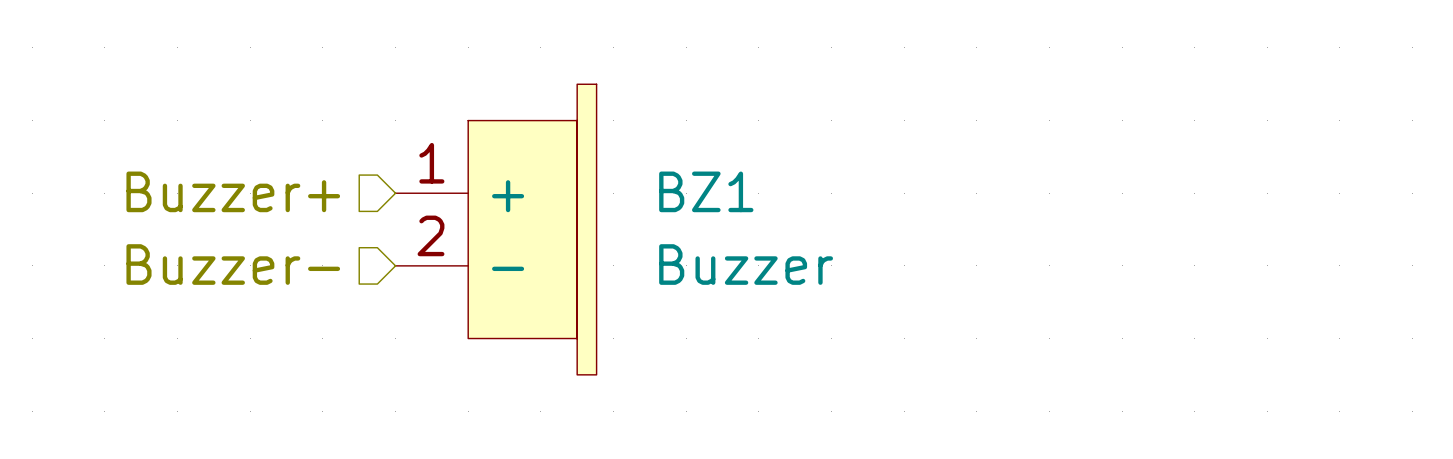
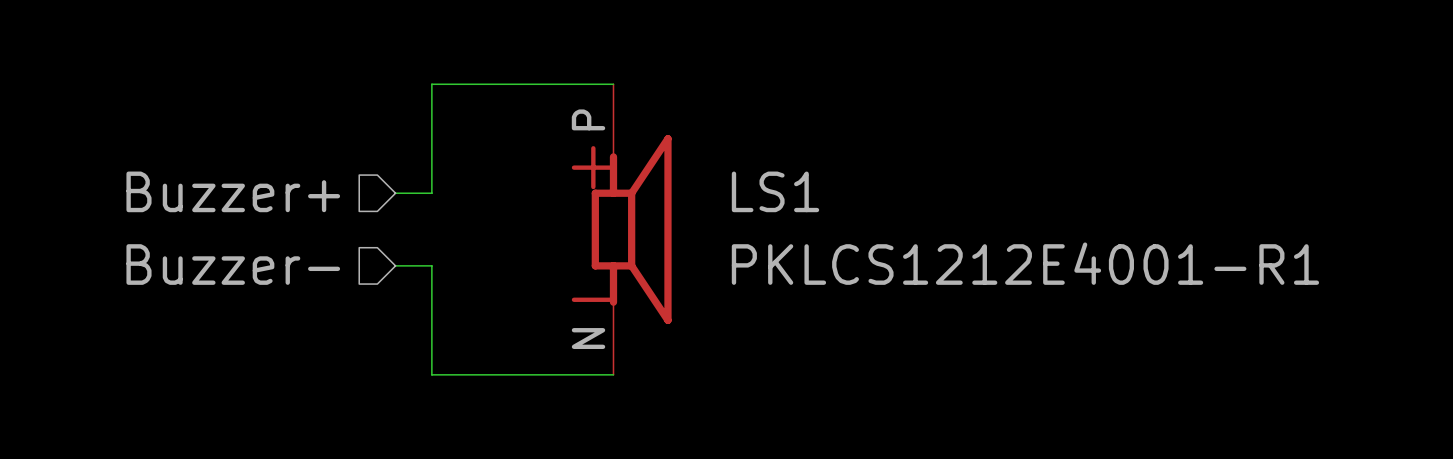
wire: none -> (613, 84) (431, 84) (431, 193) (395, 193)
BZ1: Buzzer (496, 229) -> none
LS1: none -> PKLCS1212E4001-R1 (631, 229)
wire: none -> (395, 265) (431, 265) (431, 374) (613, 374)

